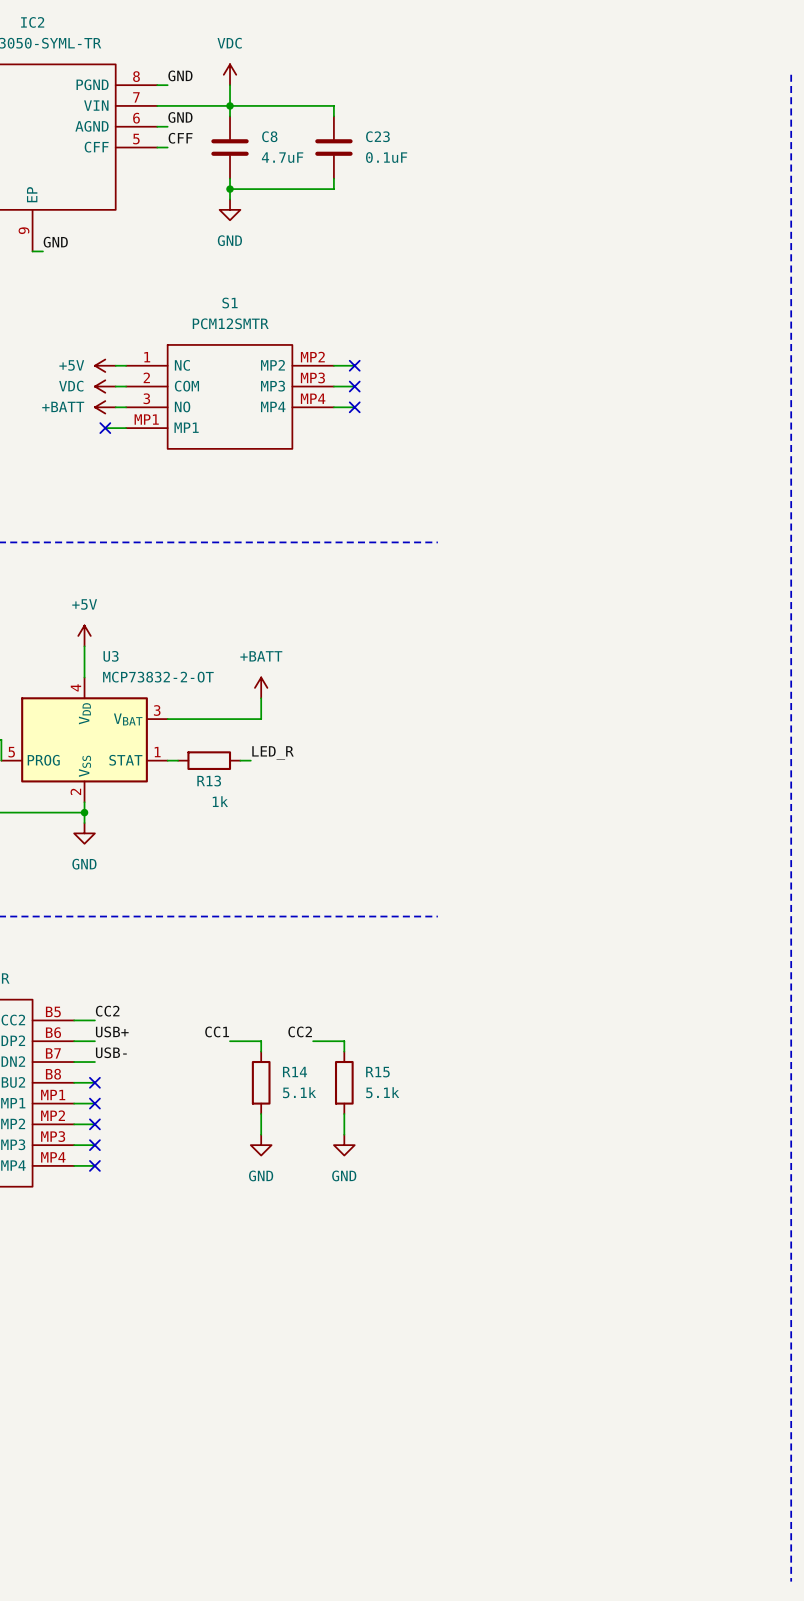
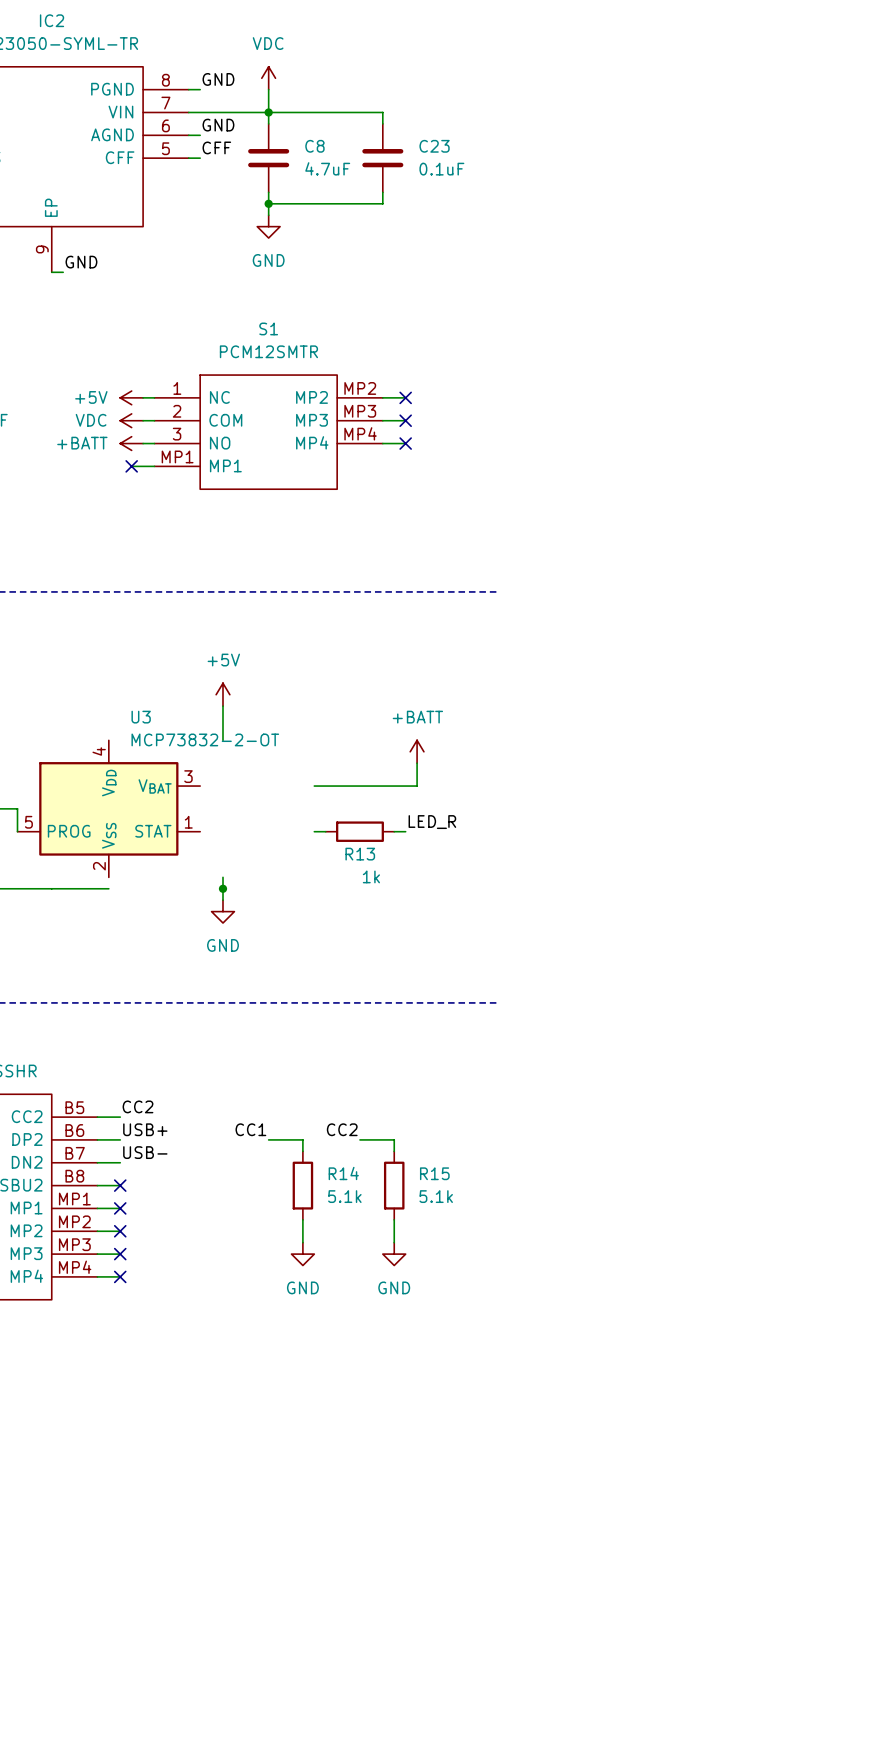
line: (791, 74) (791, 1581) -> none
power symbol position: +5V (84, 635) -> +5V (222, 694)
wire: (84, 646) (84, 677) -> (222, 706) (222, 740)
power symbol position: +BATT (261, 687) -> +BATT (417, 751)
wire: (261, 698) (261, 719) (167, 719) -> (417, 763) (417, 786) (314, 786)
label position: LED_R (273, 753) -> LED_R (432, 822)
wire: (167, 760) (178, 760) -> (314, 831) (325, 831)
R13 position: (209, 760) -> (359, 831)
wire: (240, 760) (250, 760) -> (394, 831) (405, 831)
wire: (84, 802) (84, 822) -> (222, 877) (222, 900)
junction: (84, 812) -> none
junction: none -> (222, 888)
power symbol position: GND (84, 833) -> GND (222, 911)

